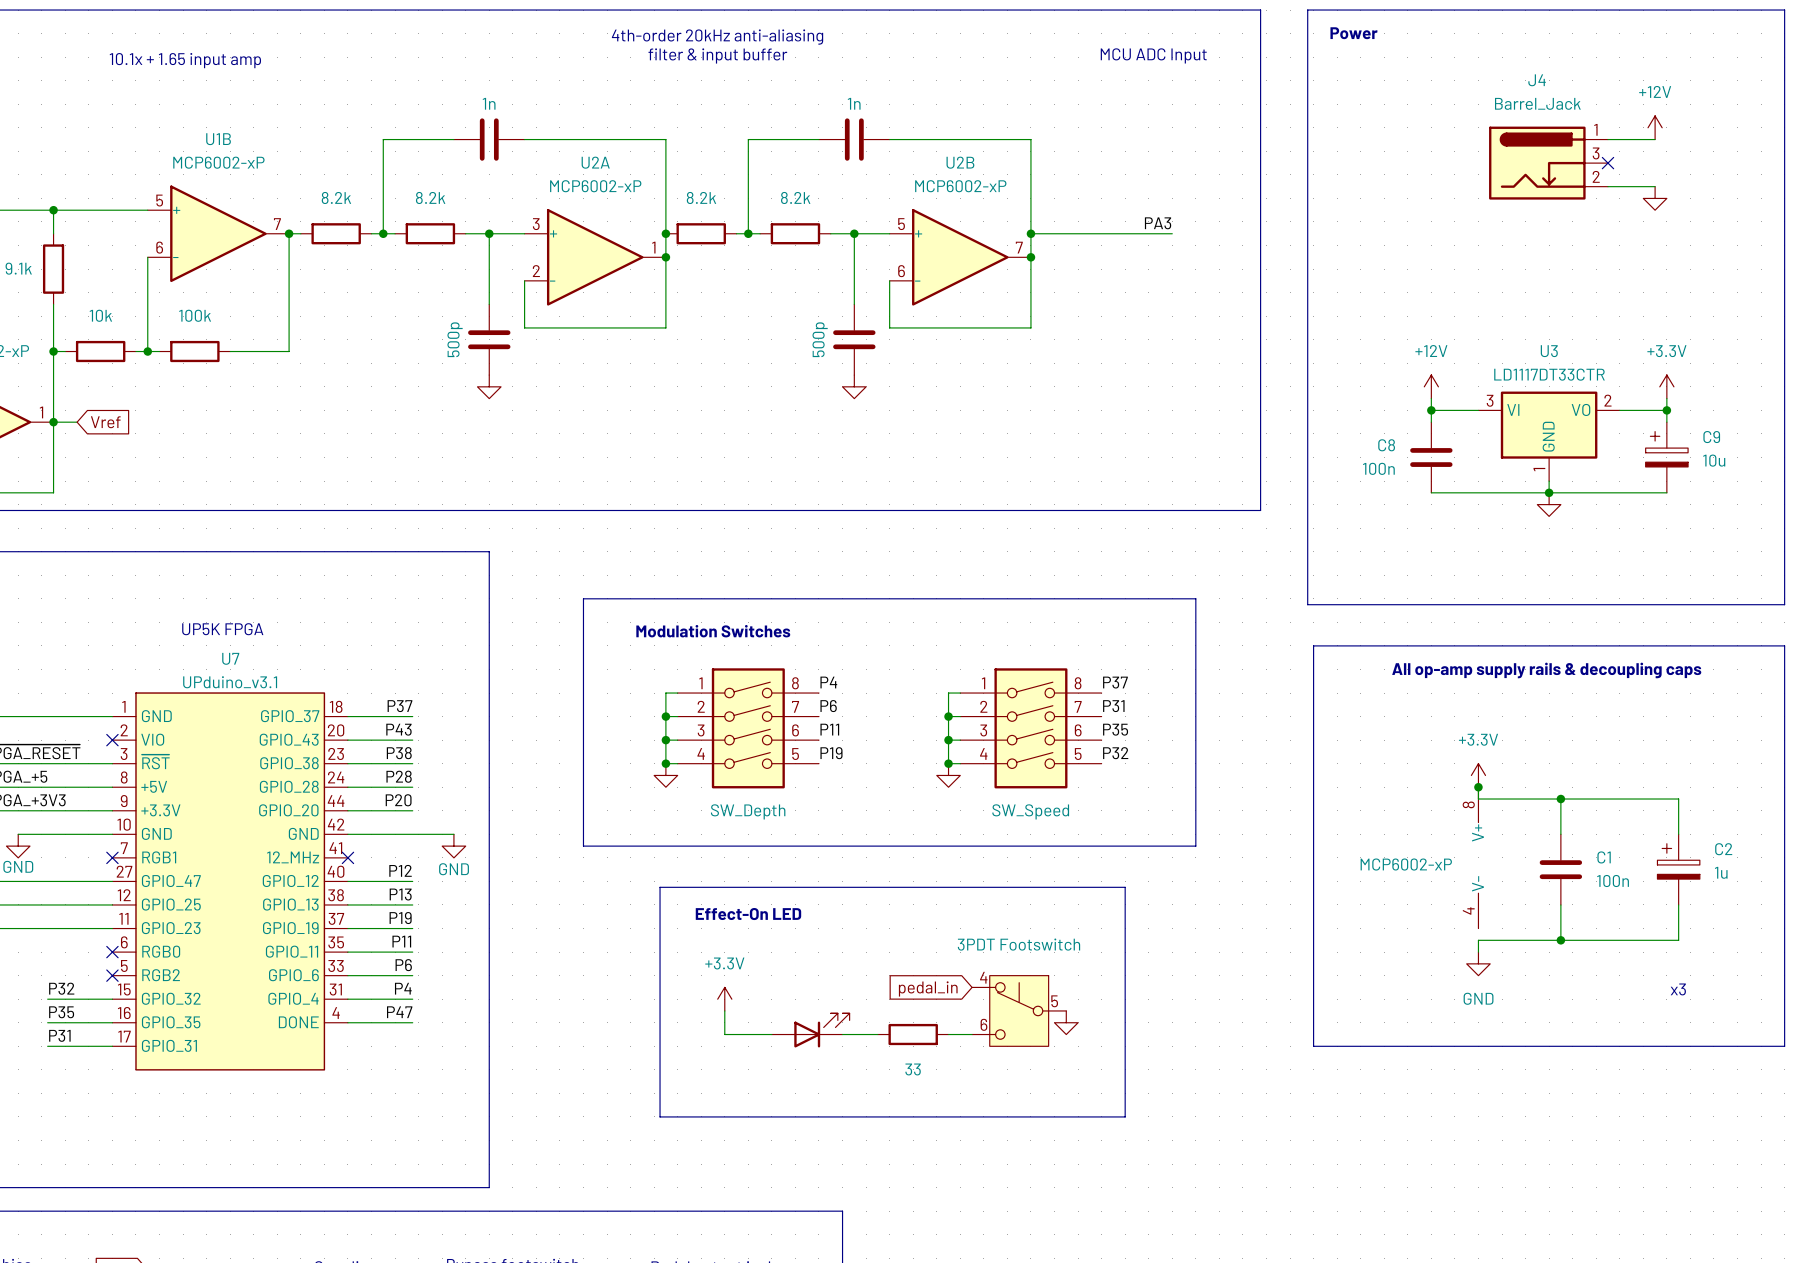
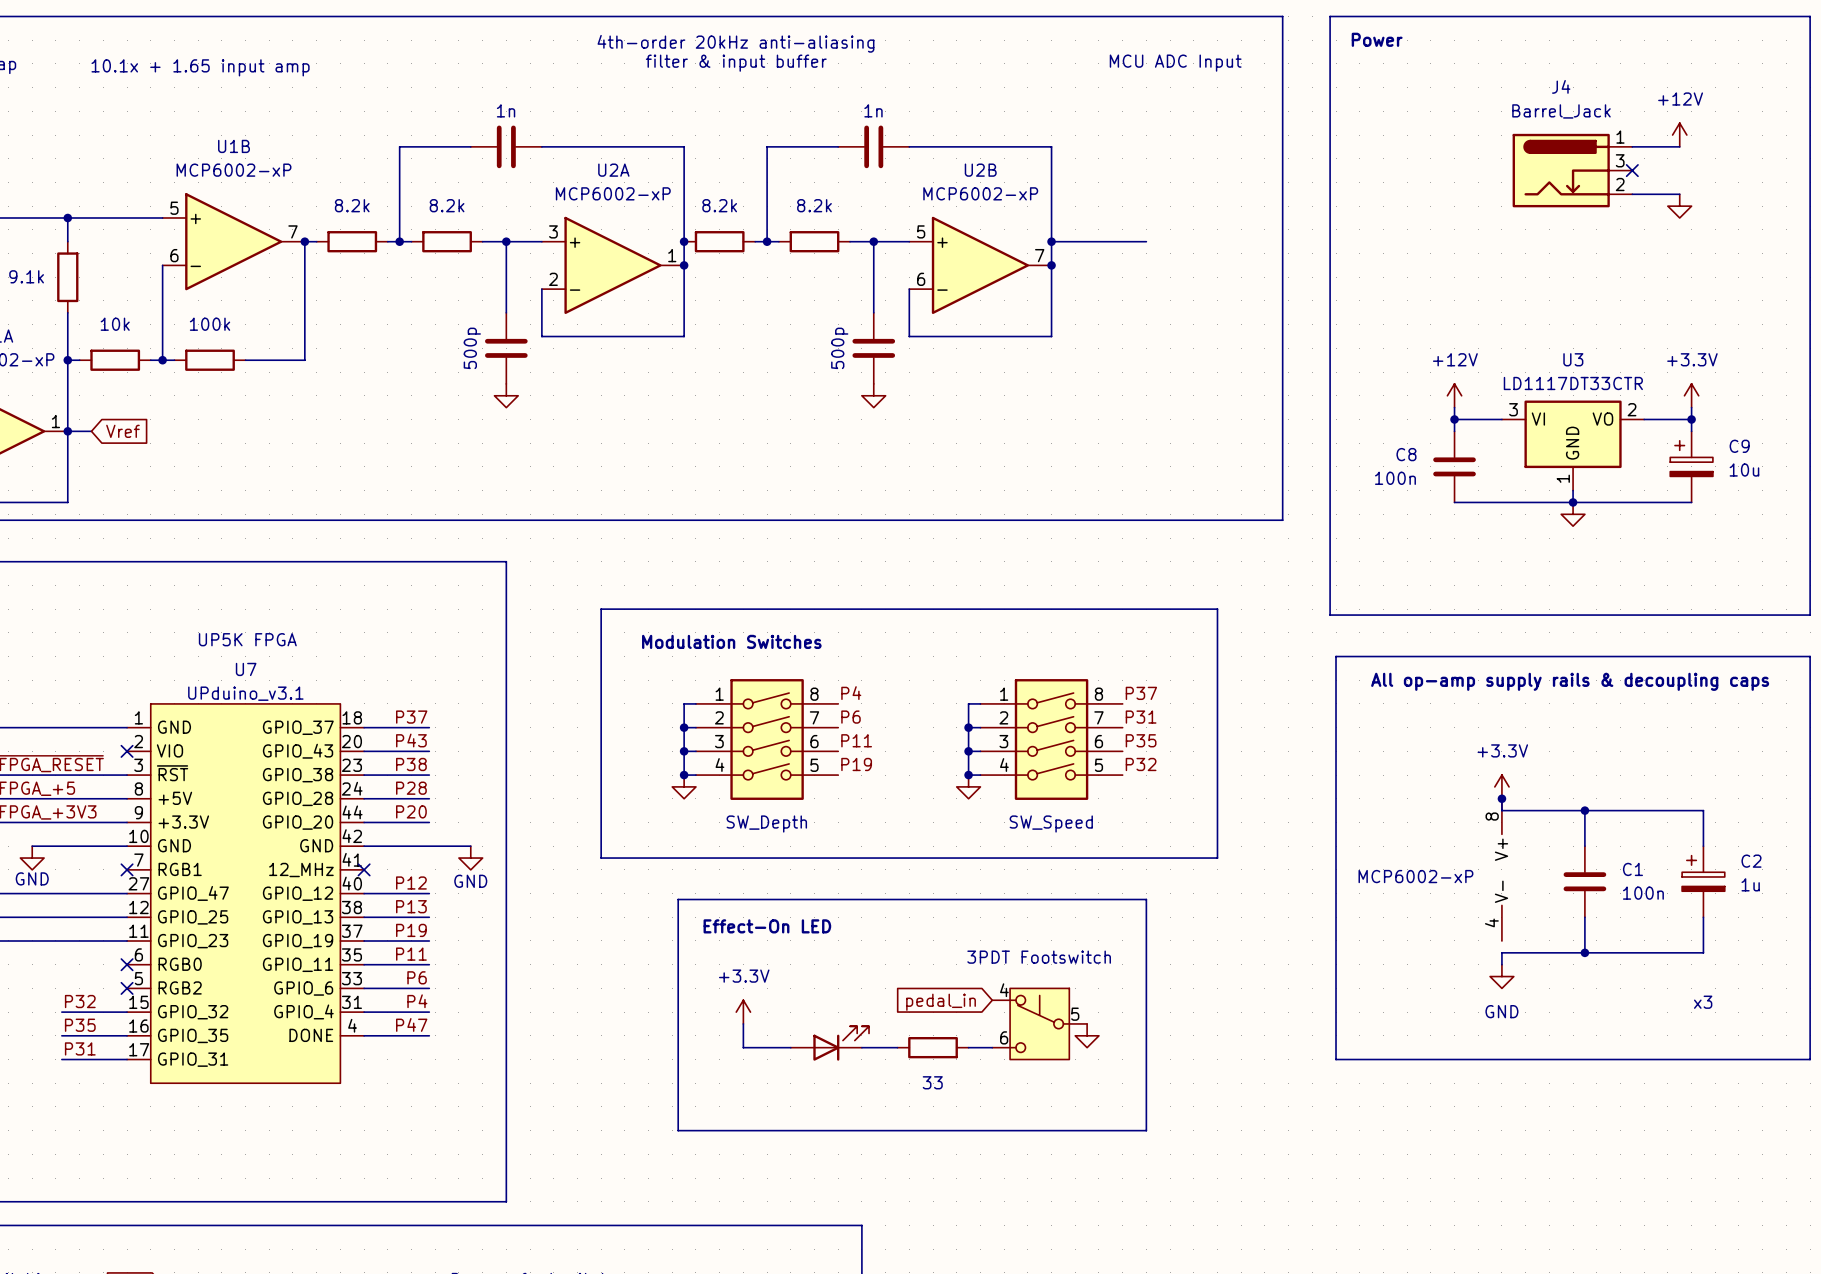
label: PA3 (1158, 223) -> none
wire: (1125, 233) (1172, 233) -> none

